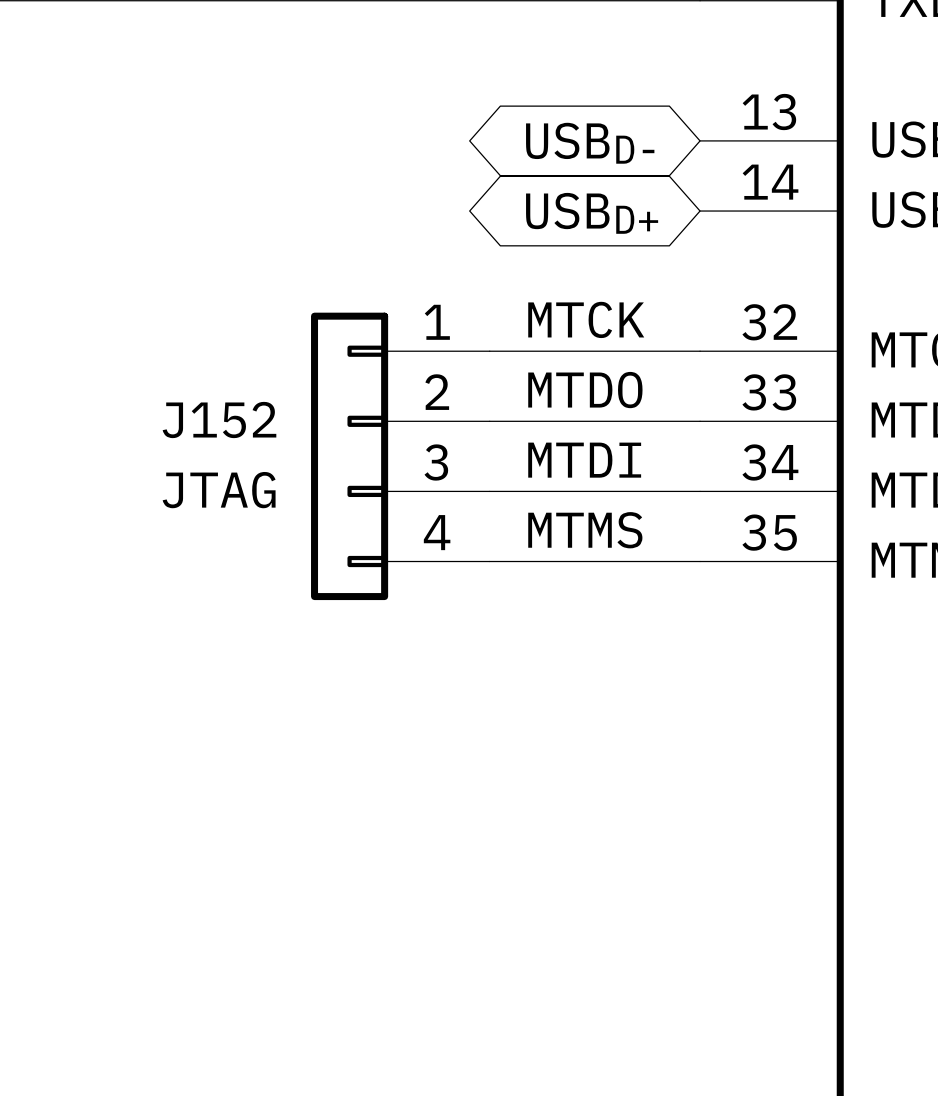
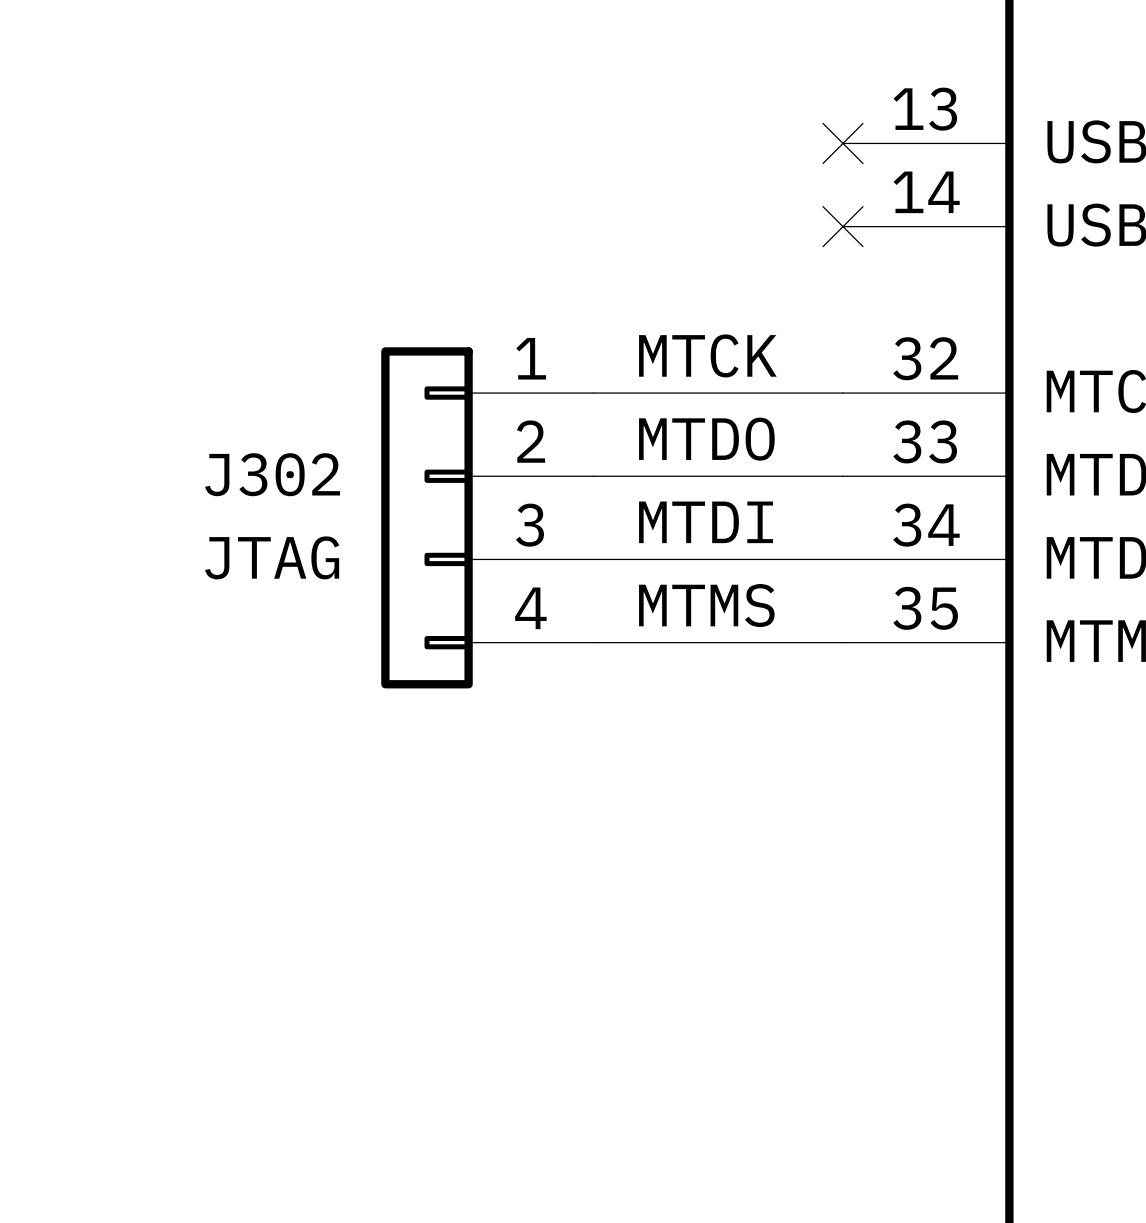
no-connect mark: none -> (843, 143)
global label: USBD- (590, 143) -> none
no-connect mark: none -> (843, 226)
global label: USBD+ (592, 213) -> none
J152 name: J152 (219, 420) -> J302 (272, 474)

